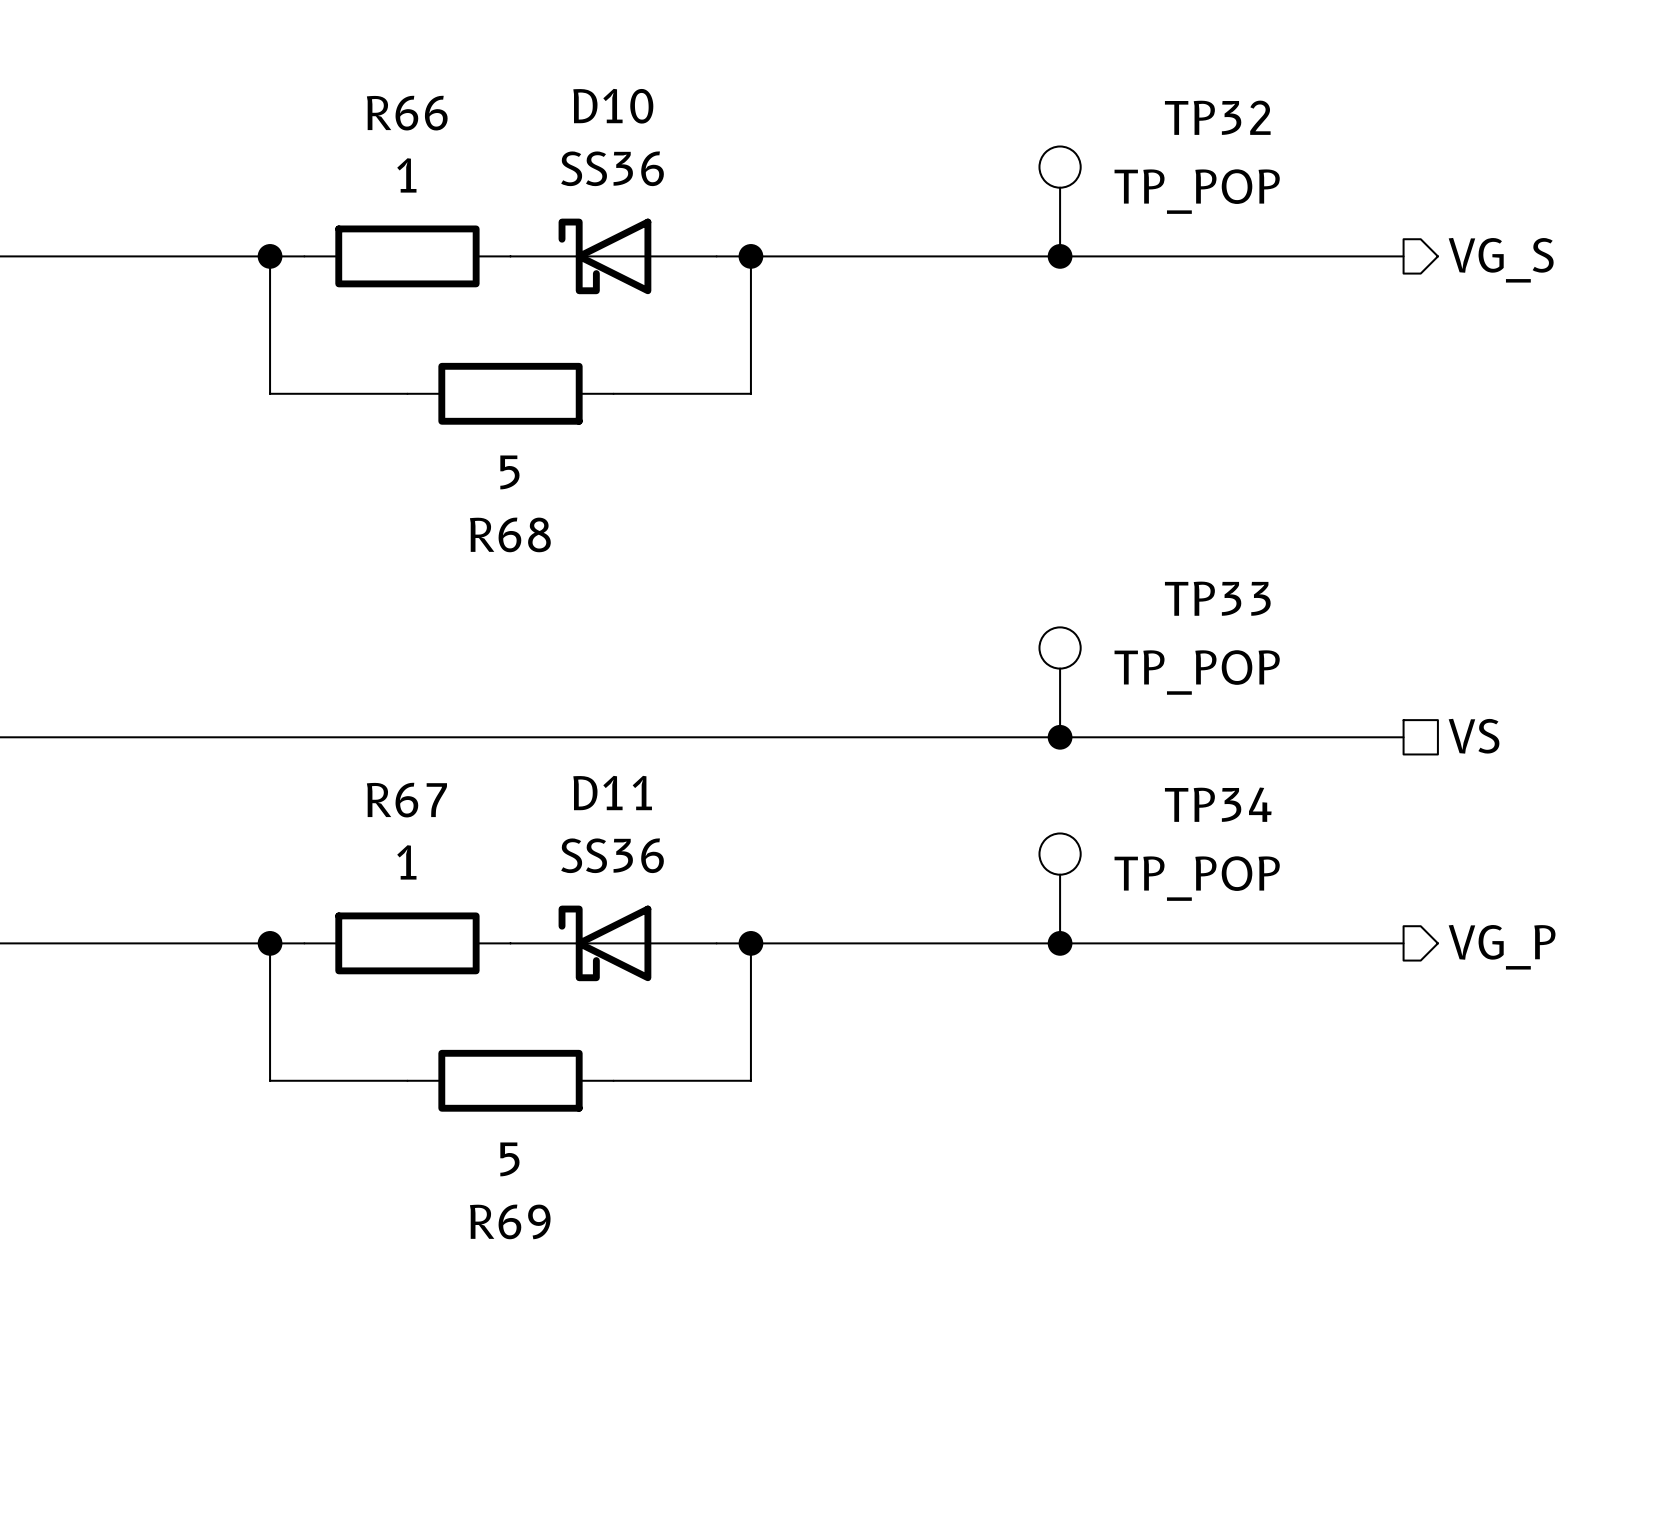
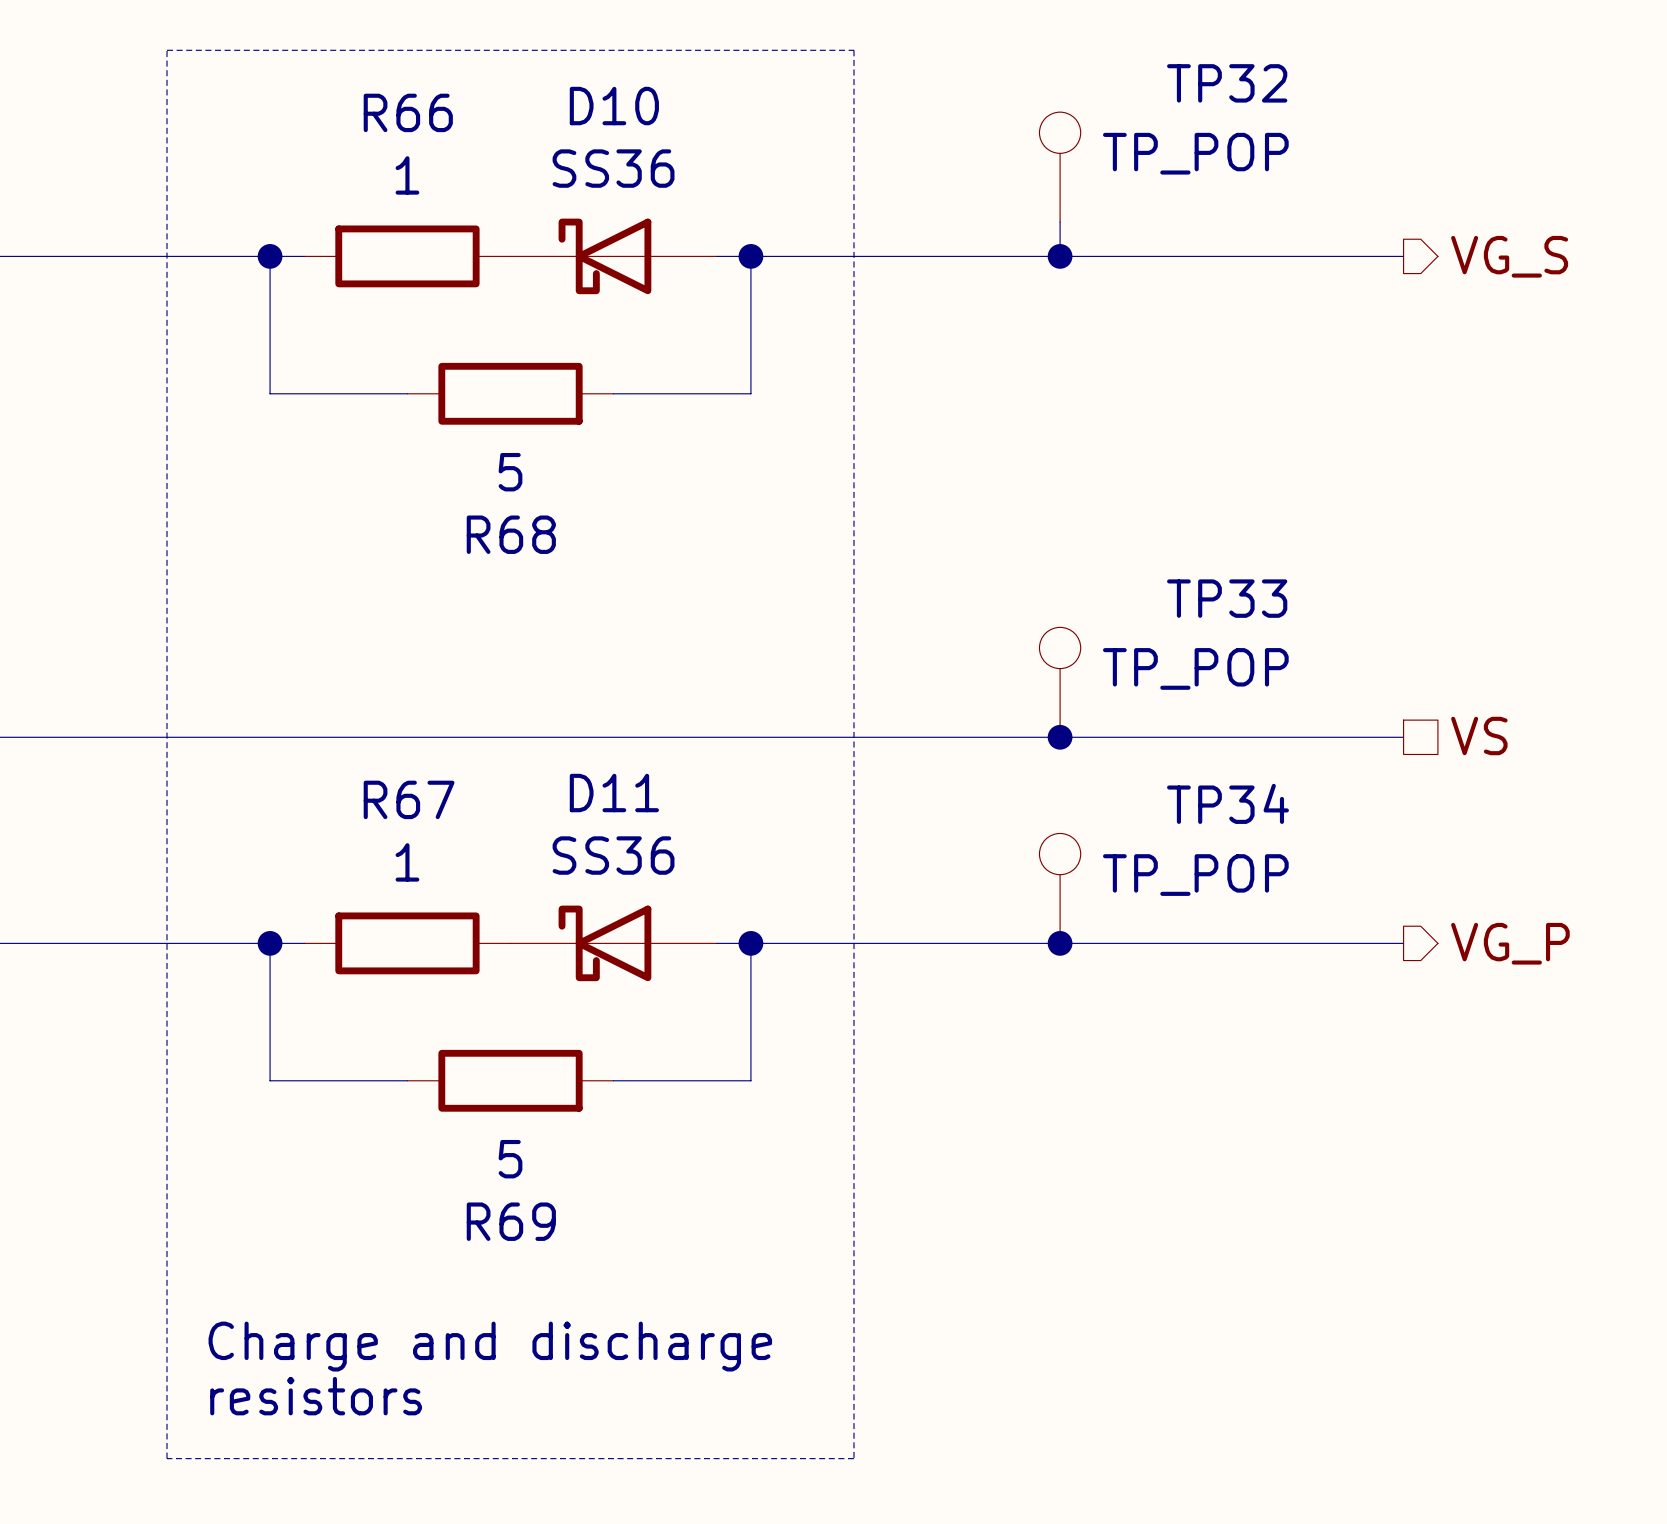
line: none -> (167, 50) (167, 1458) (853, 1458) (853, 50) (167, 50)
TP32 position: (1060, 201) -> (1060, 167)
text: none -> Charge and discharge (490, 1346)
text: none -> resistors (316, 1396)

